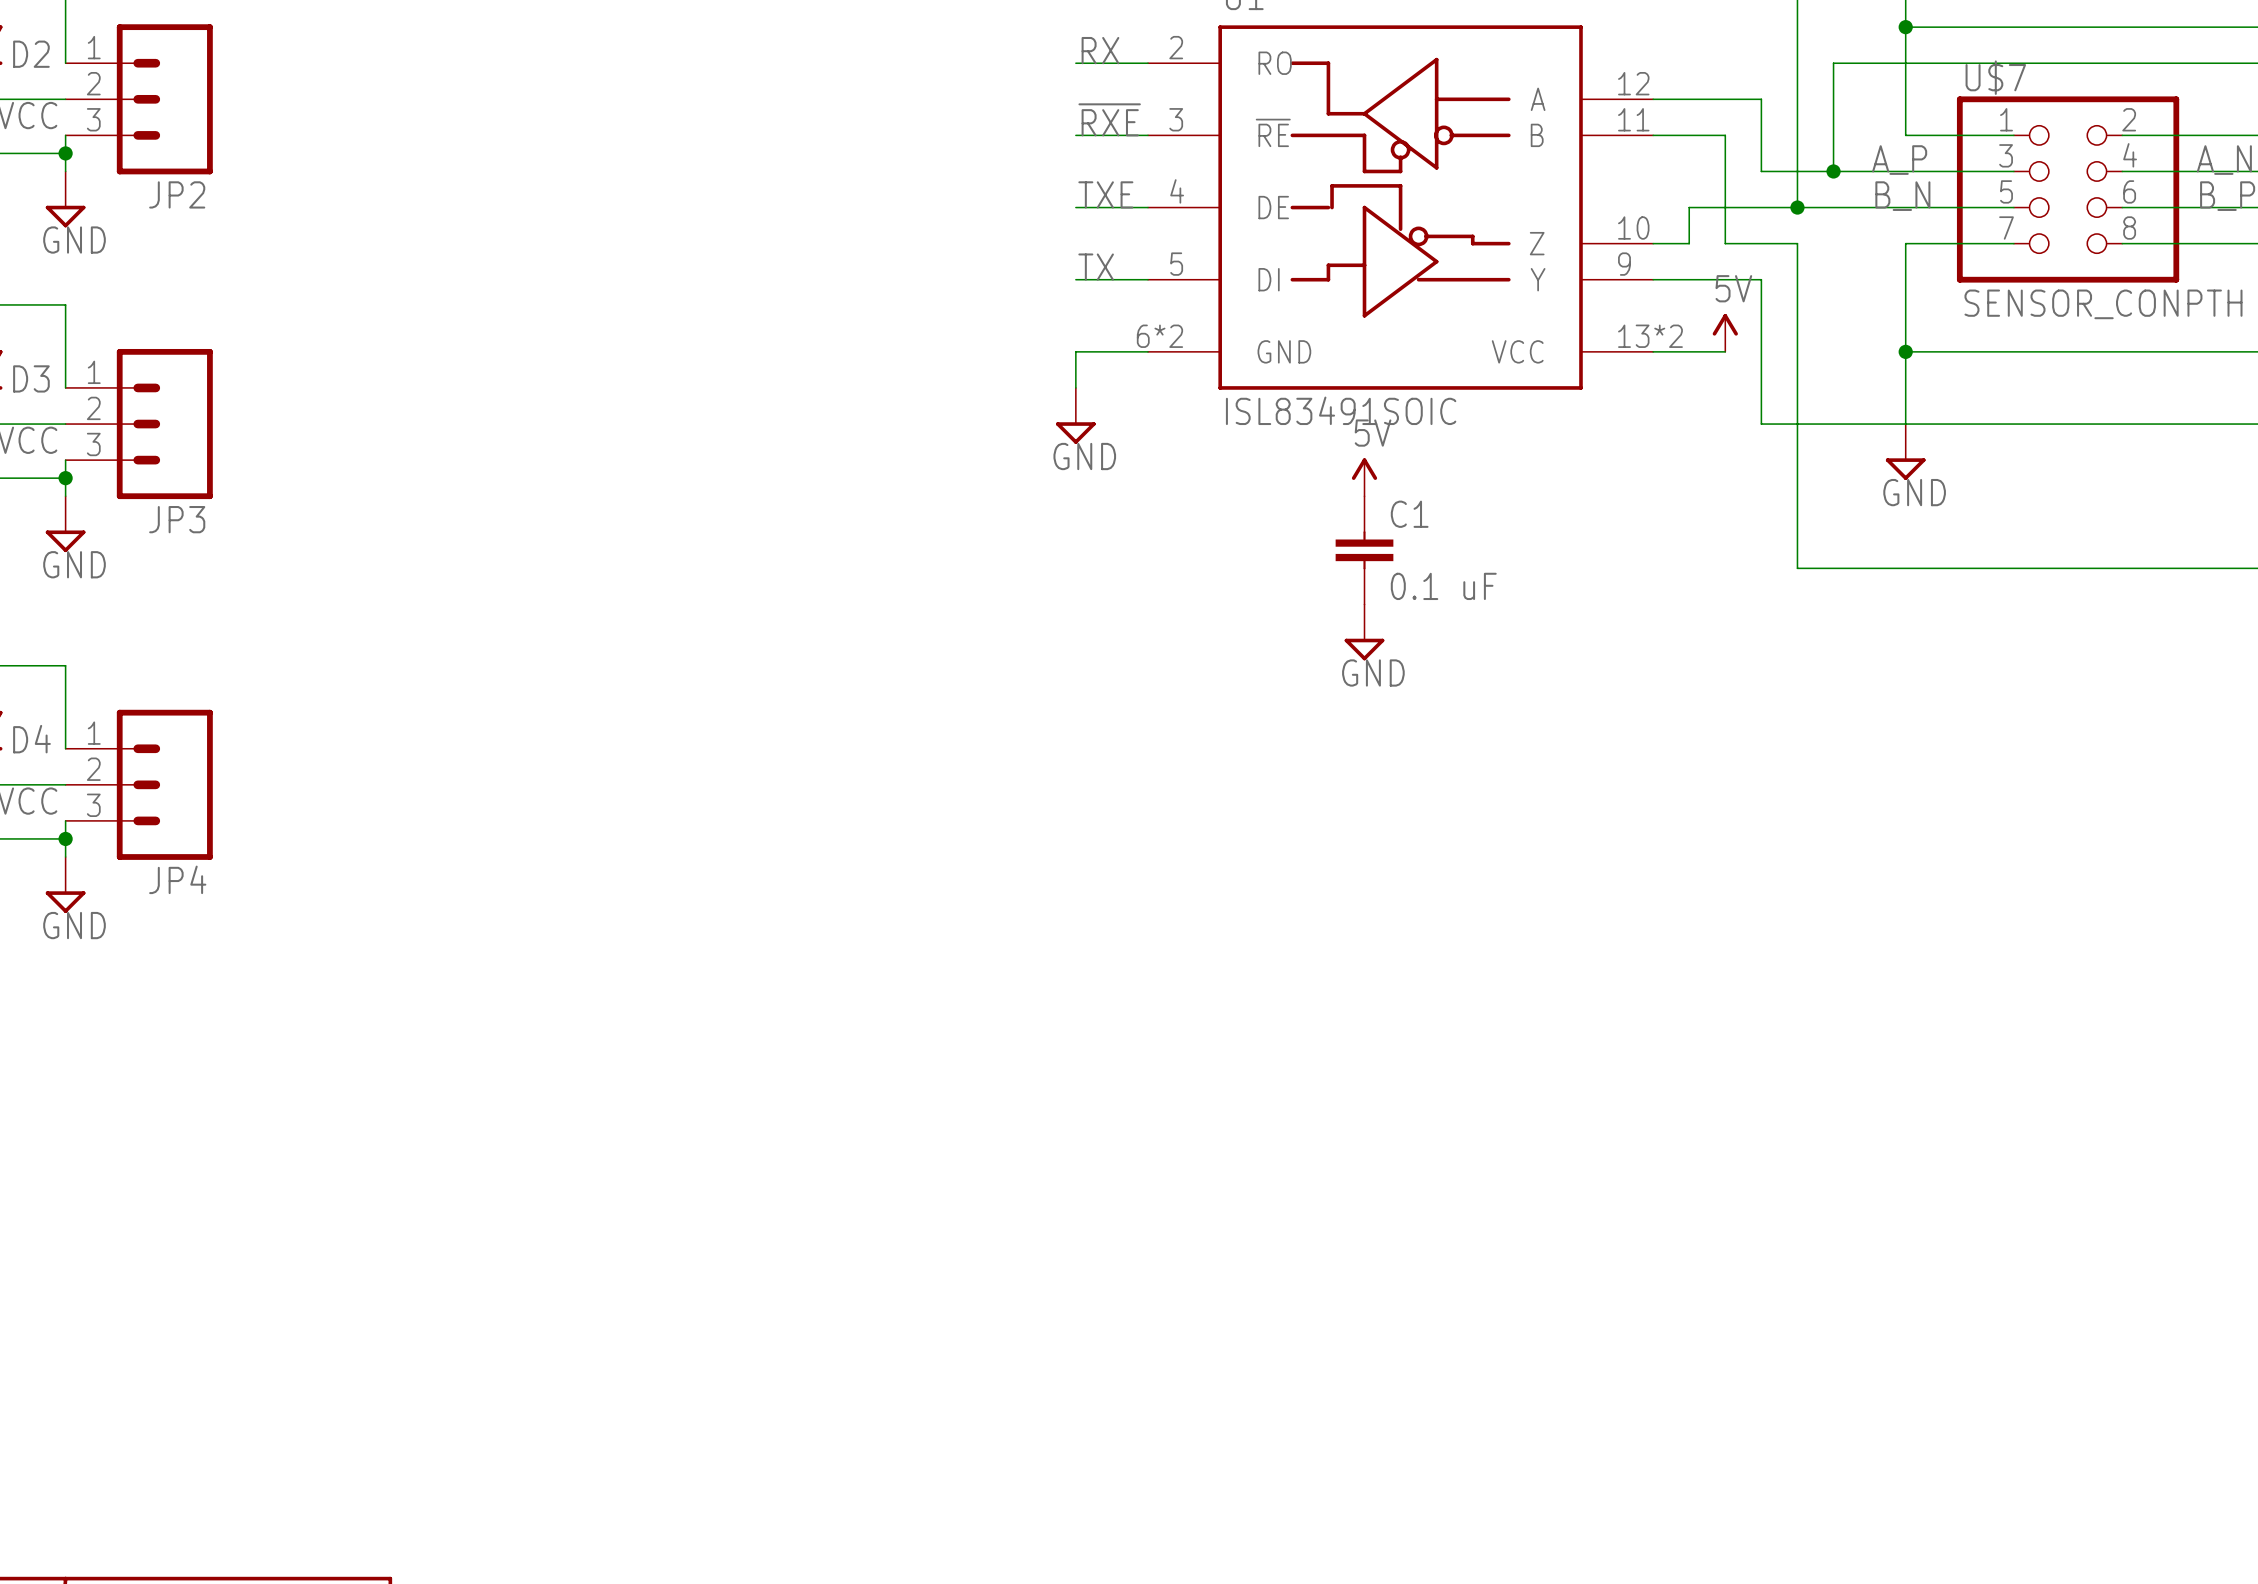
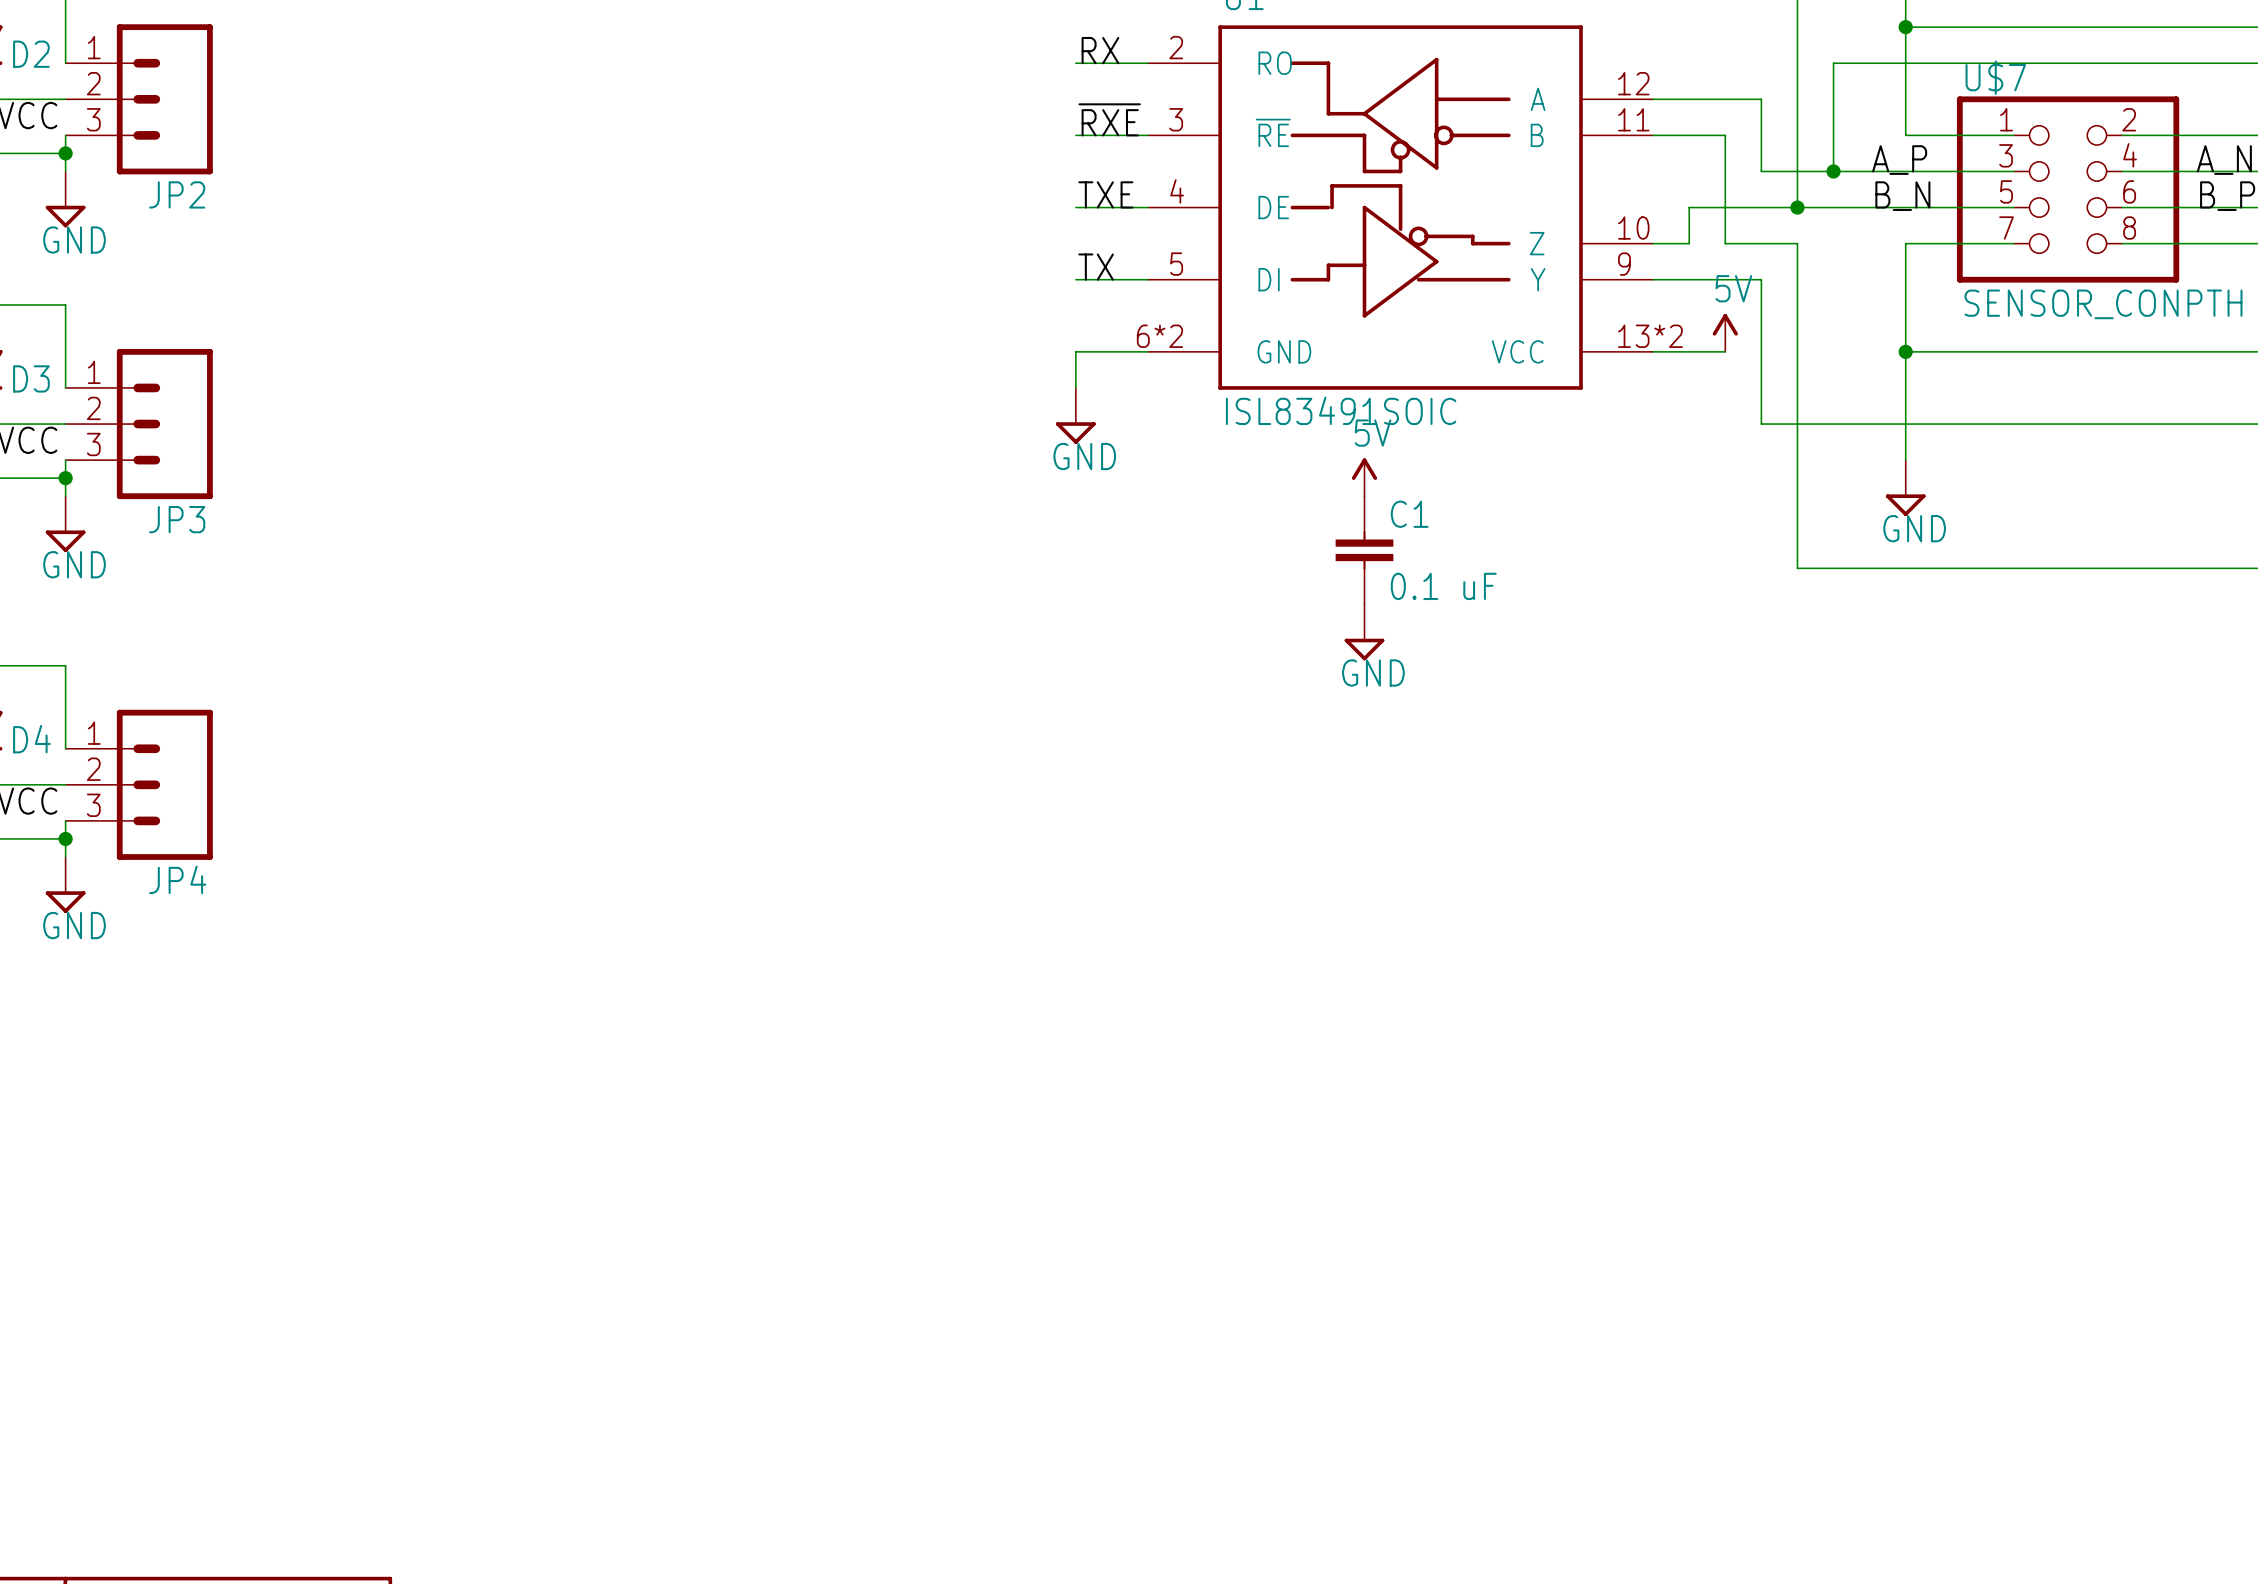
power symbol position: GND (1905, 451) -> GND (1905, 488)

